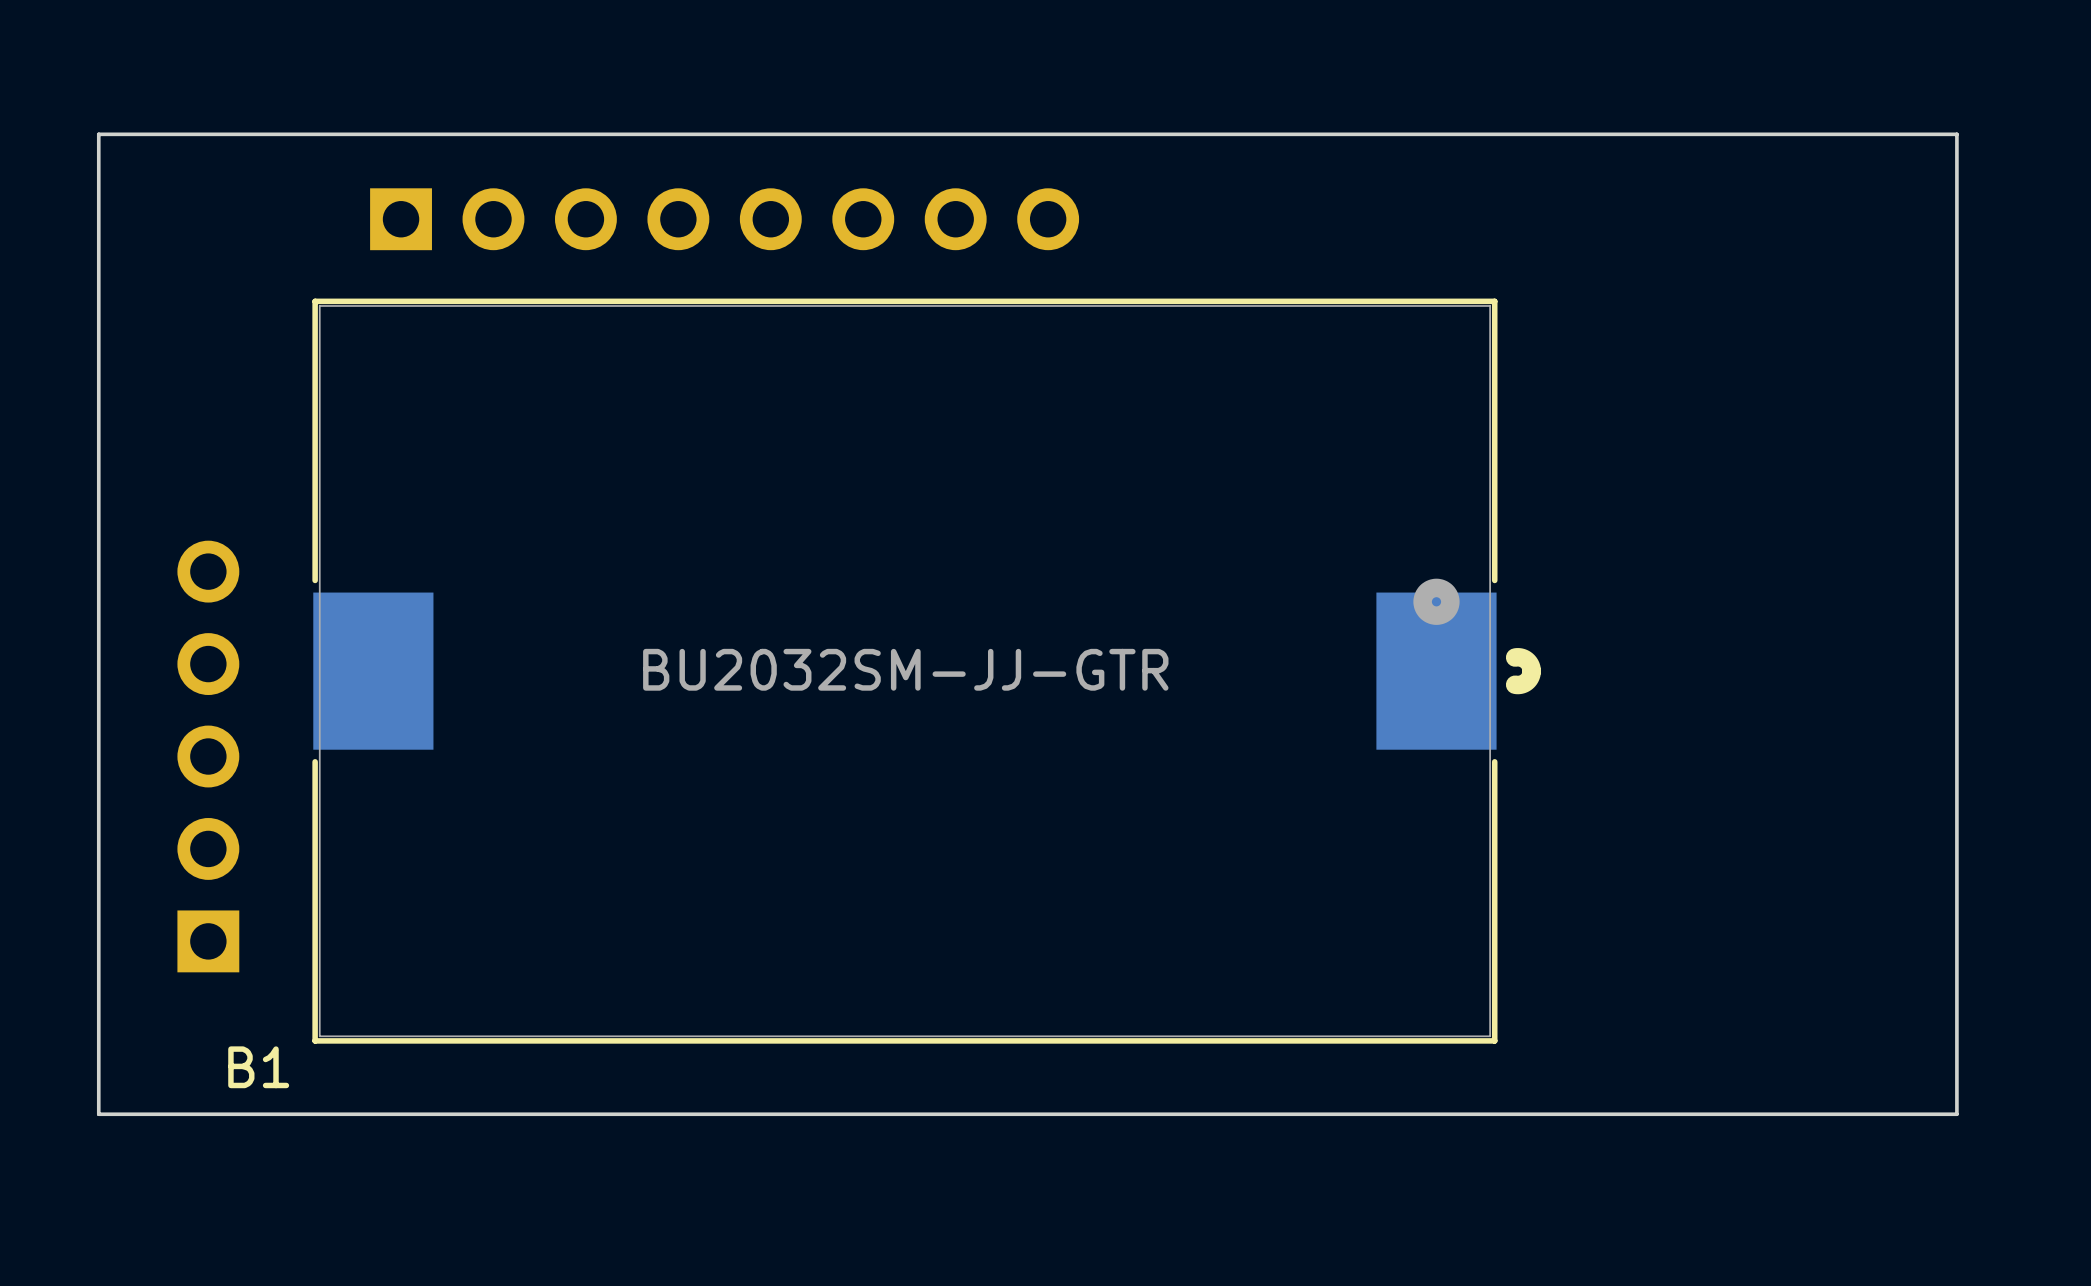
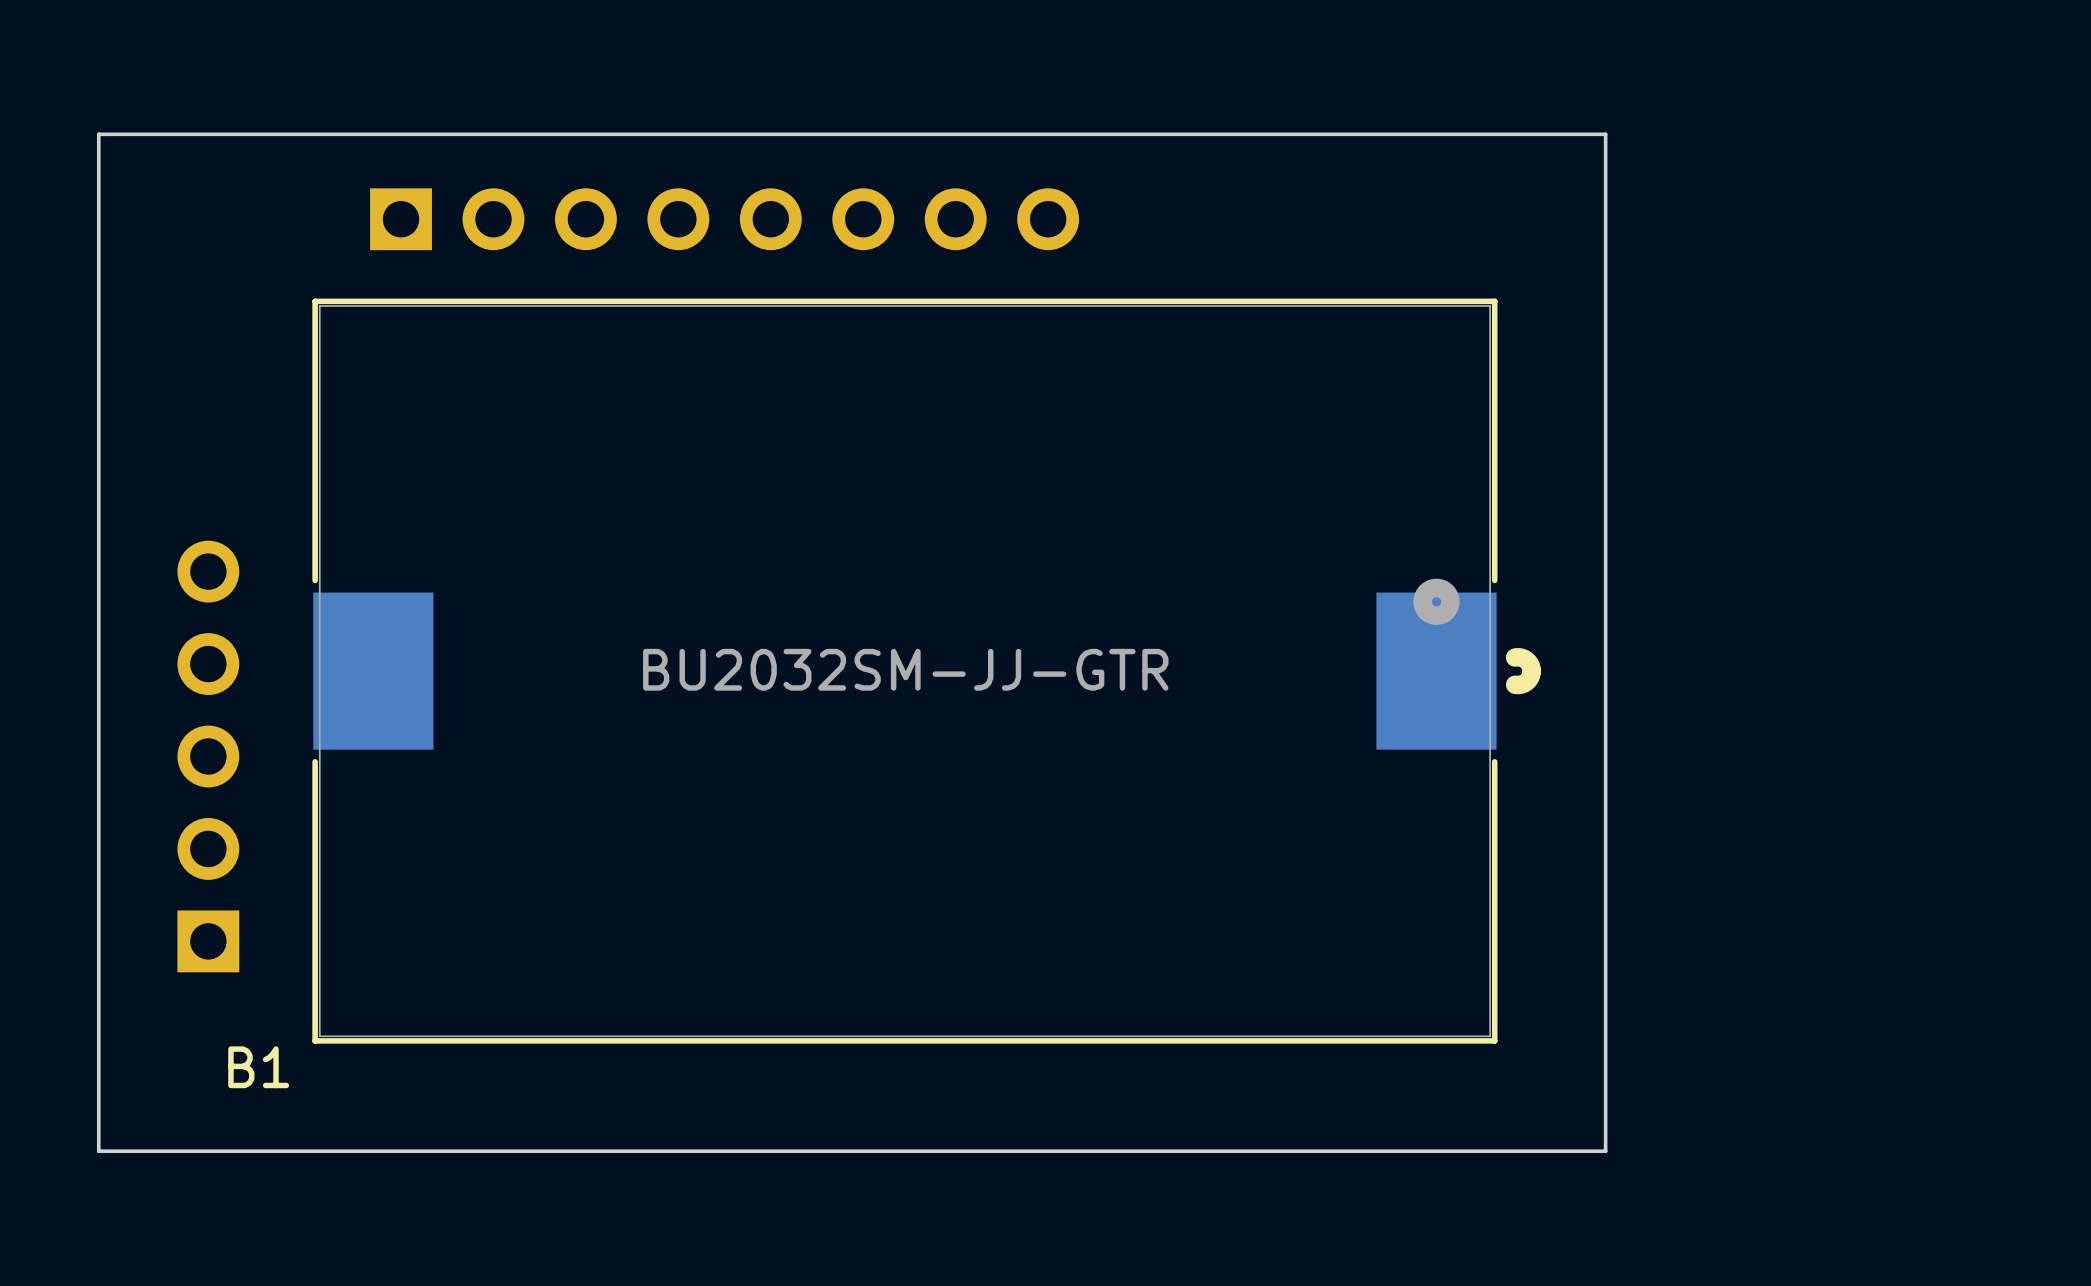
board edge: (1605, 134) (1956, 134) (1956, 1114) (98, 1114) -> (1605, 134) (1605, 1151) (98, 1151) (98, 1114)

